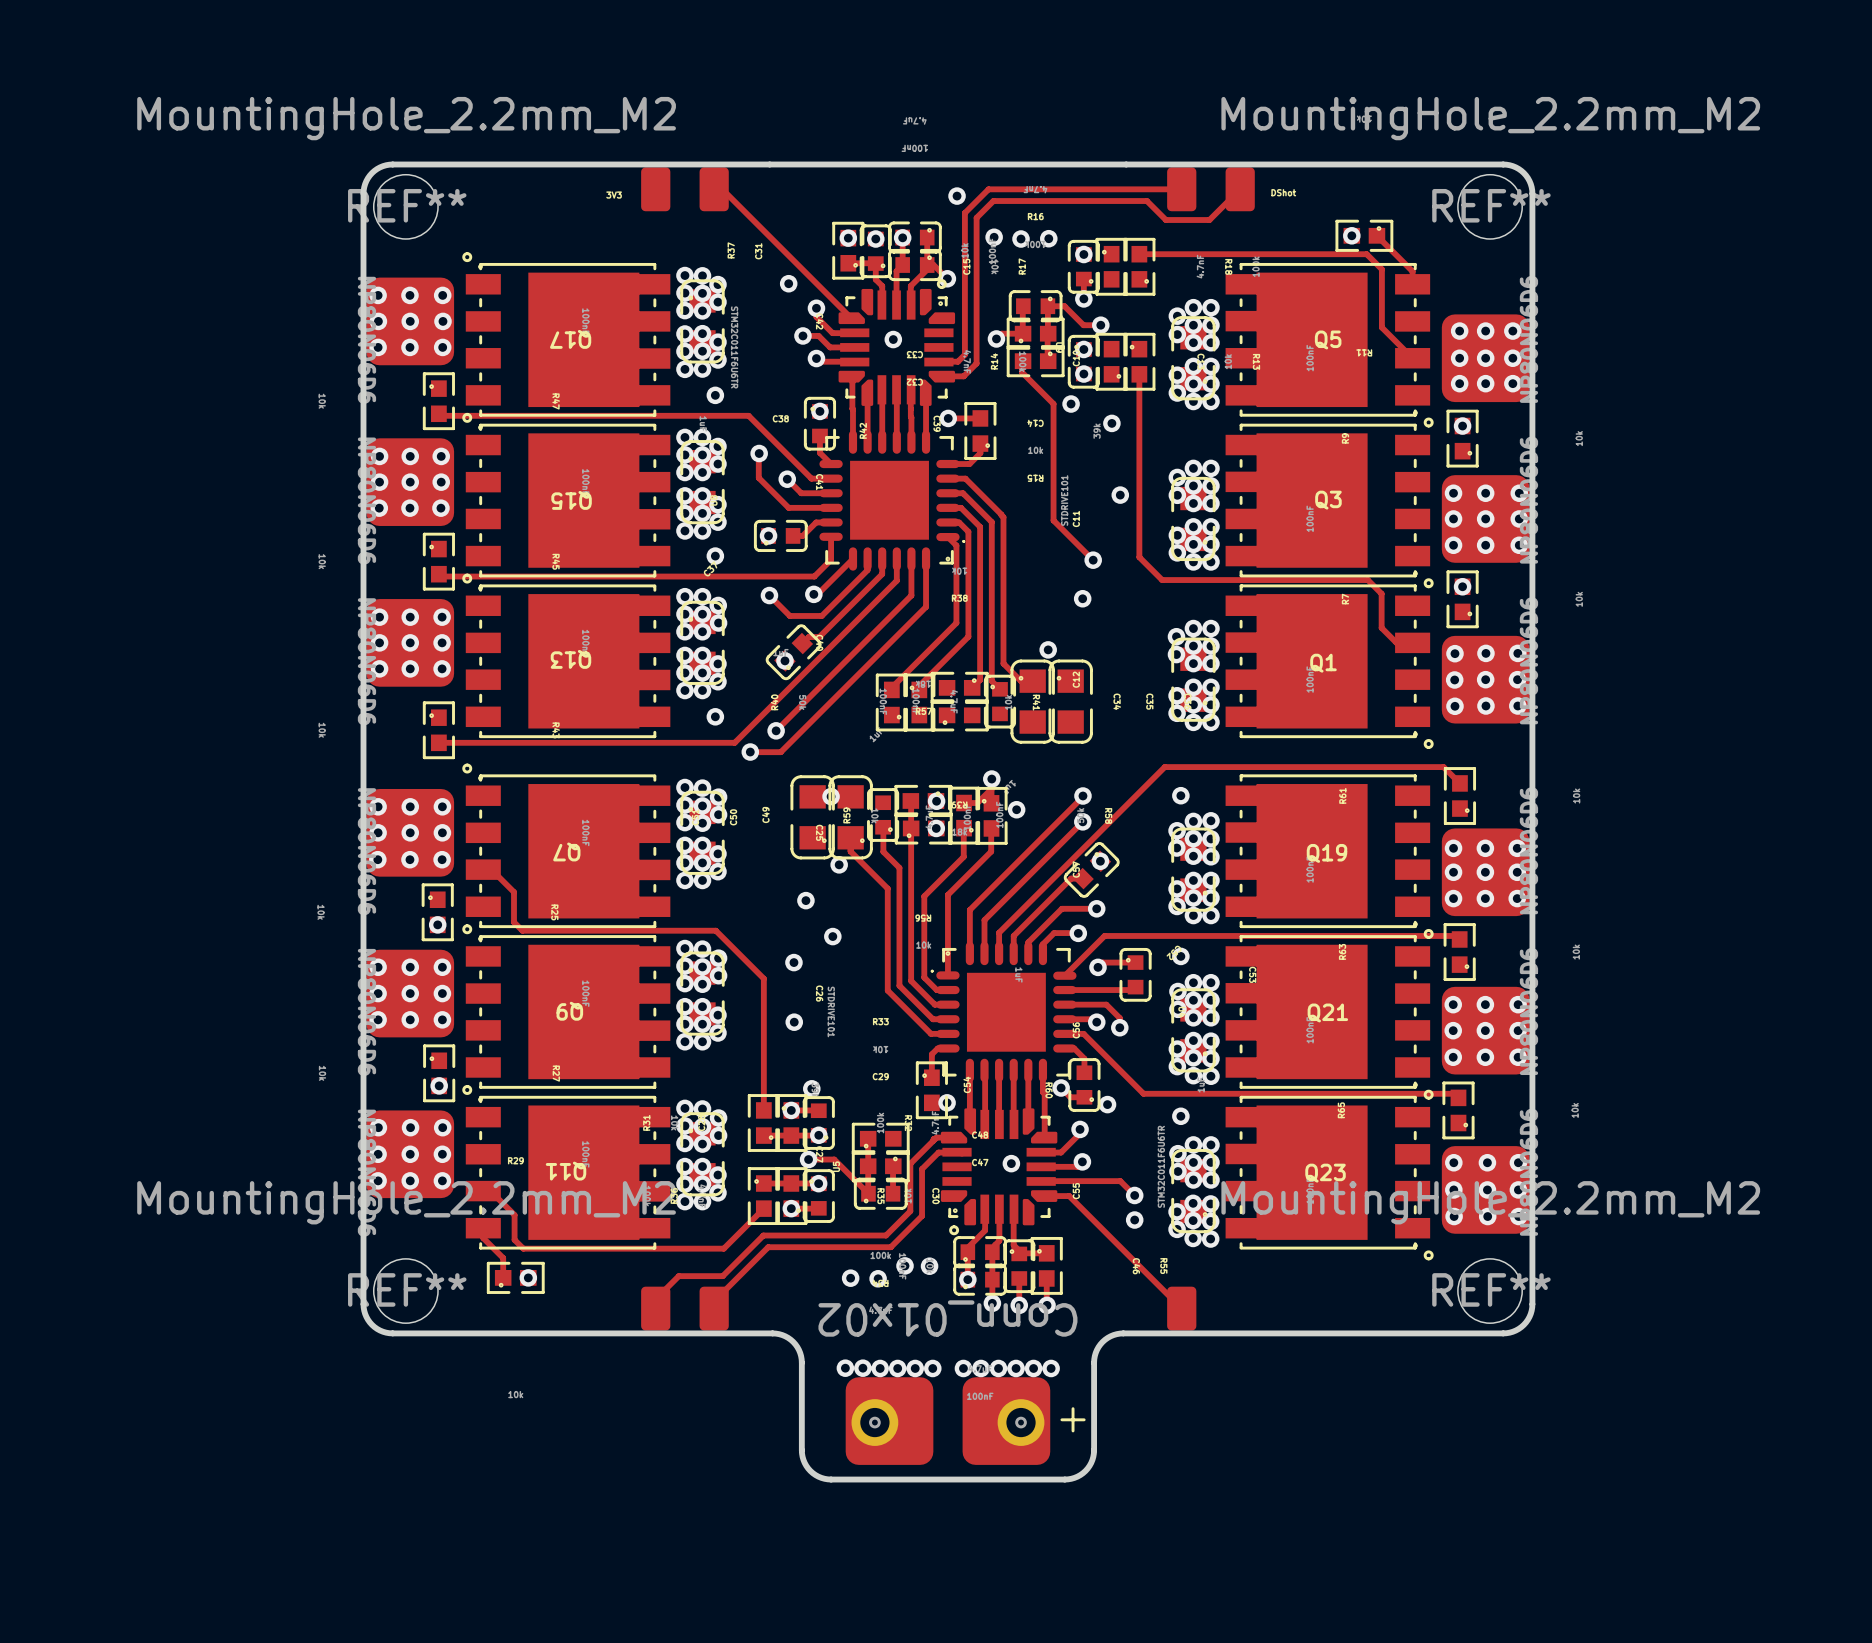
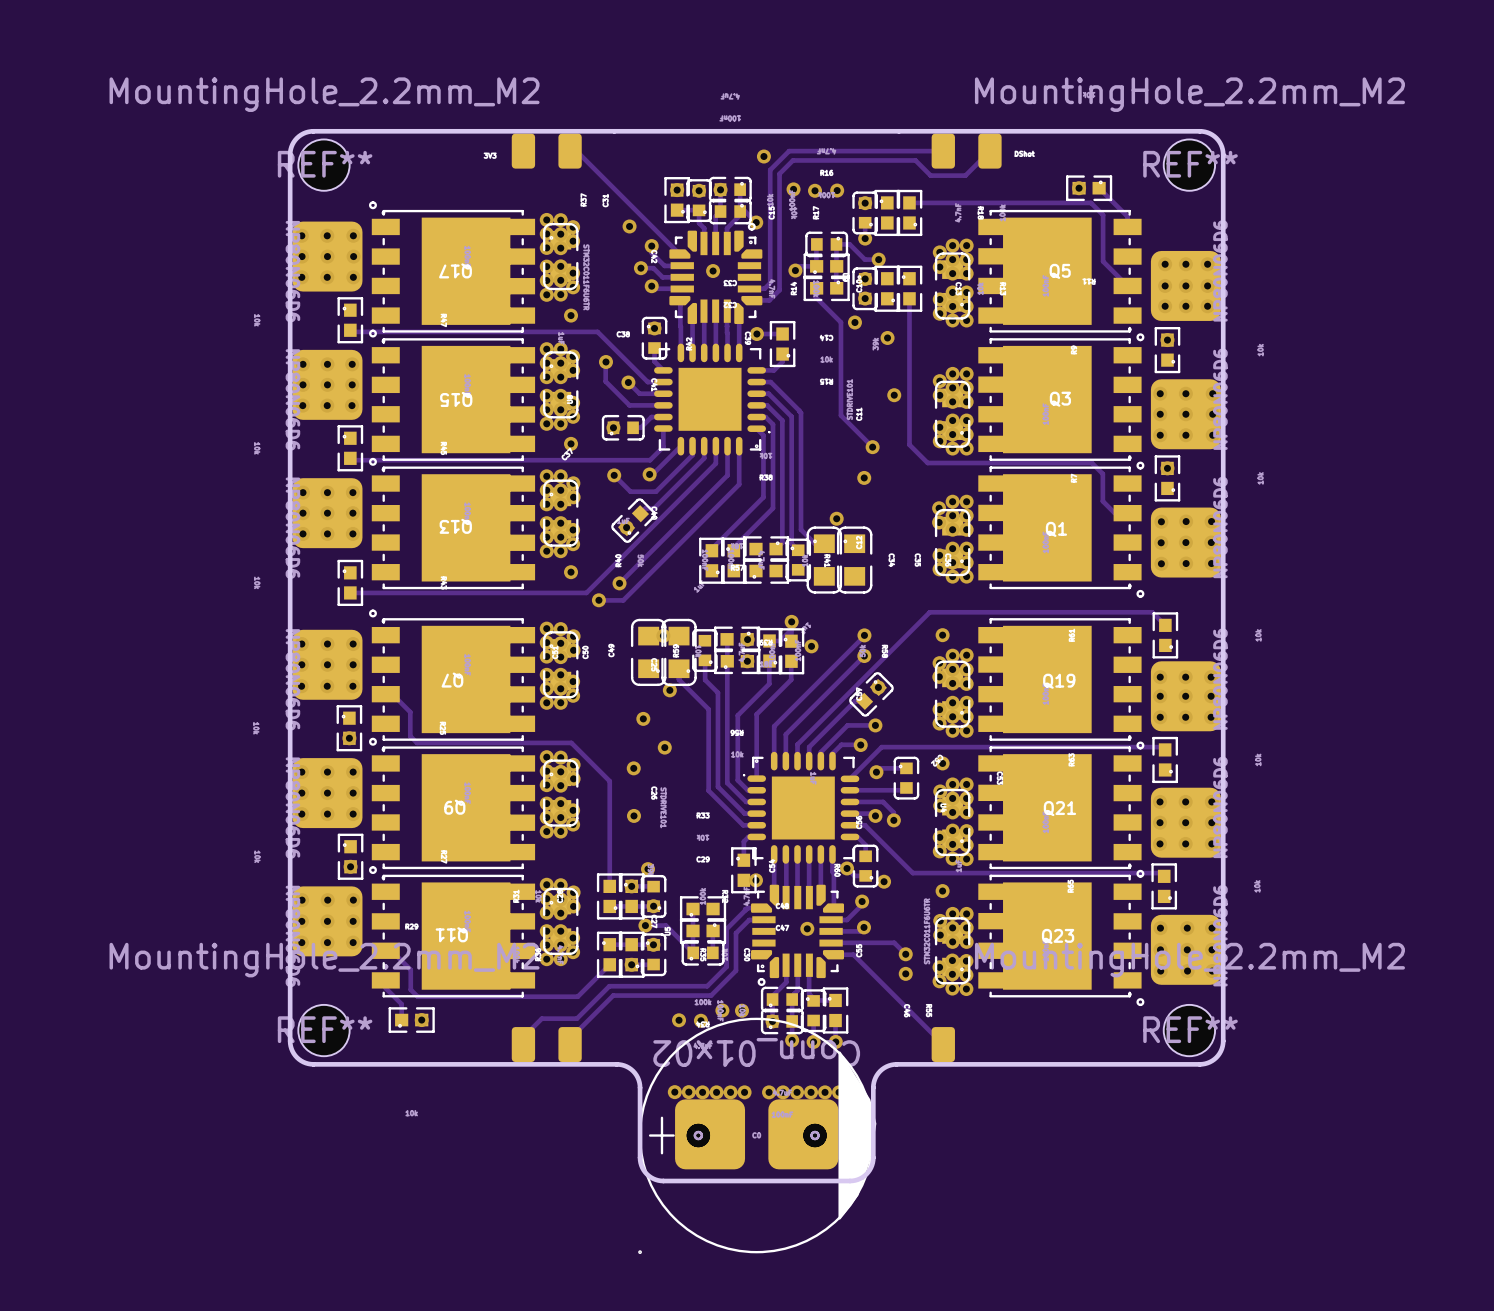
part: none -> (757, 1135)

